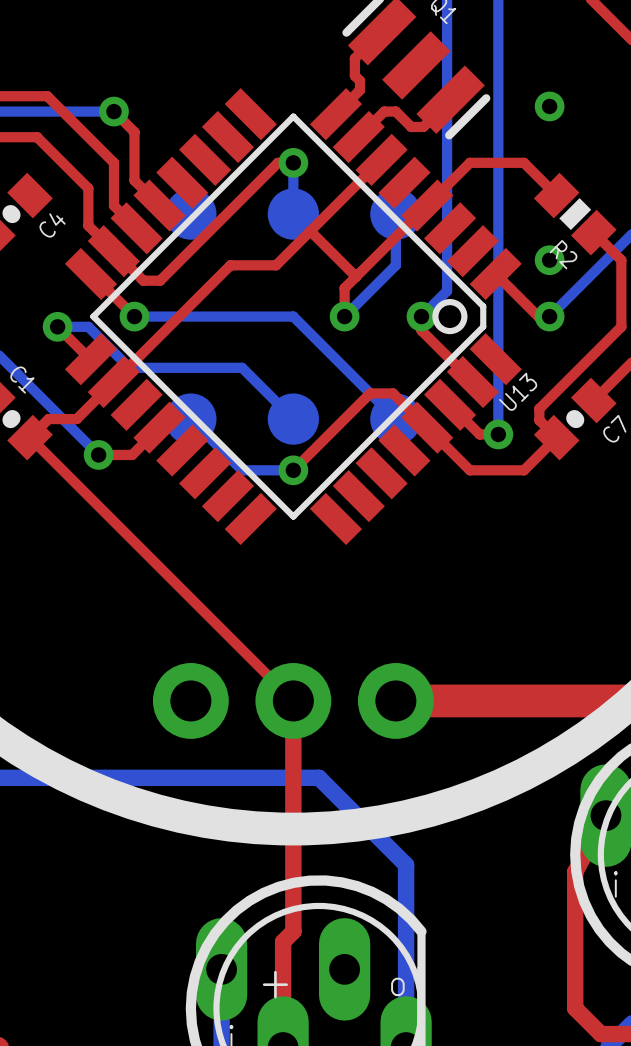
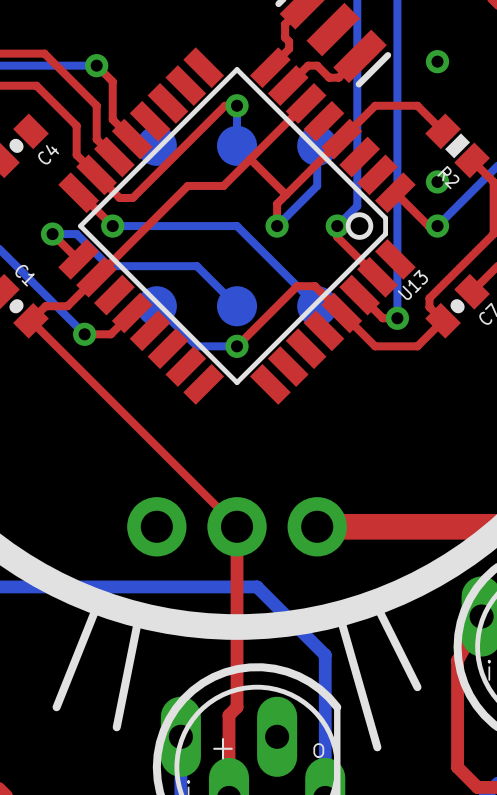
line: none -> (96, 606) (56, 707)
line: none -> (337, 606) (377, 747)
line: none -> (377, 606) (417, 687)
line: none -> (136, 627) (116, 727)

